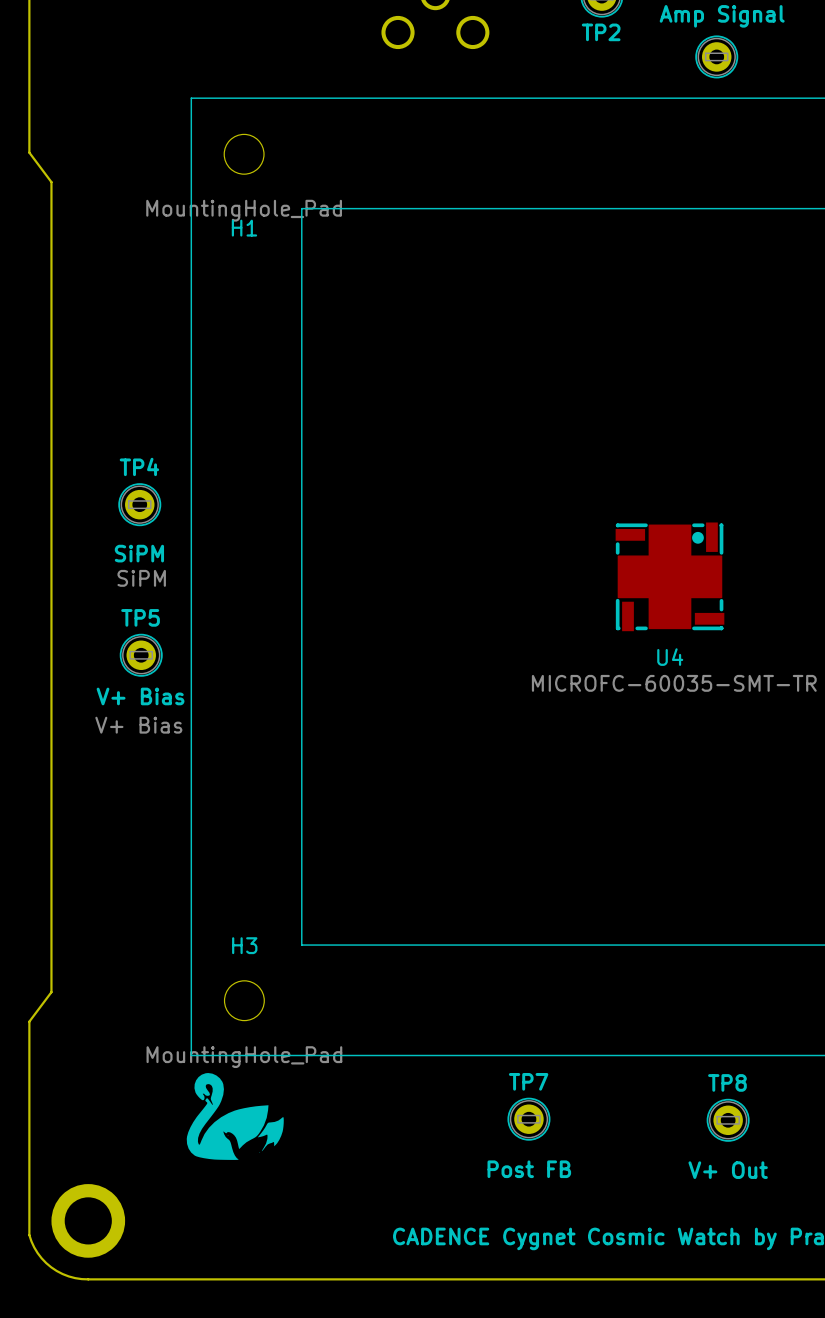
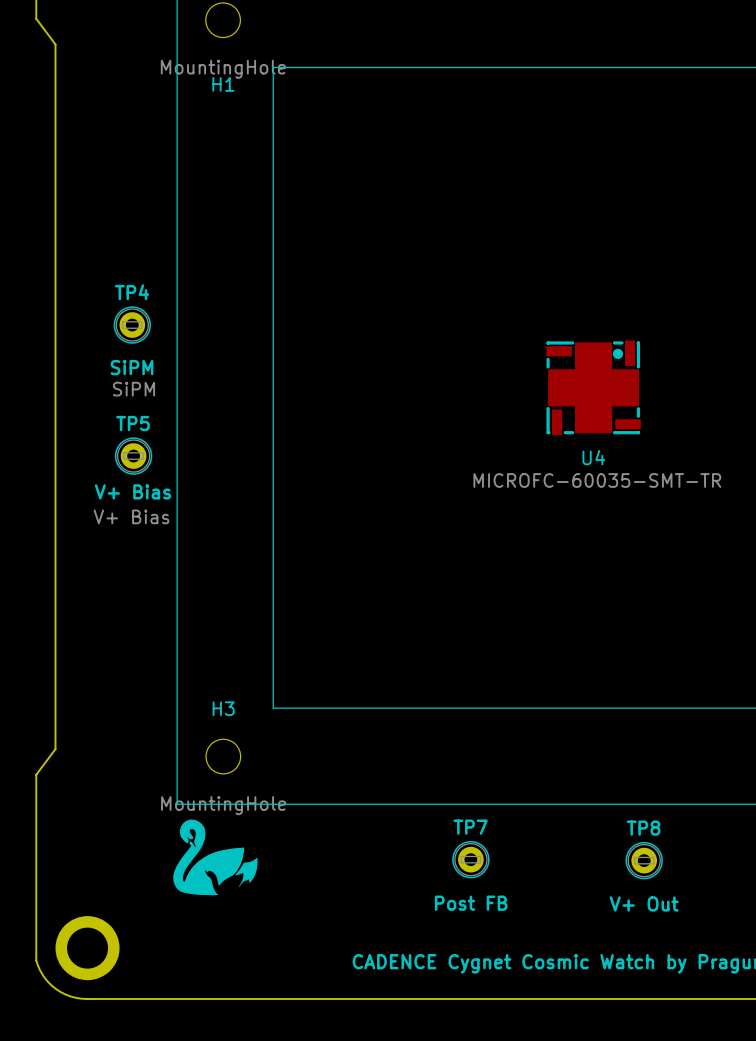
H1 value: MountingHole_Pad (244, 210) -> MountingHole (223, 69)
H3 value: MountingHole_Pad (244, 1057) -> MountingHole (223, 805)

